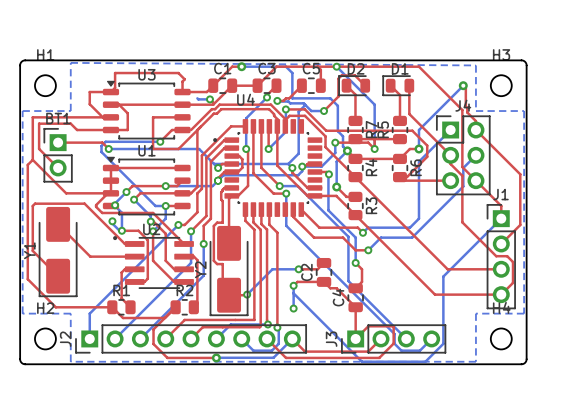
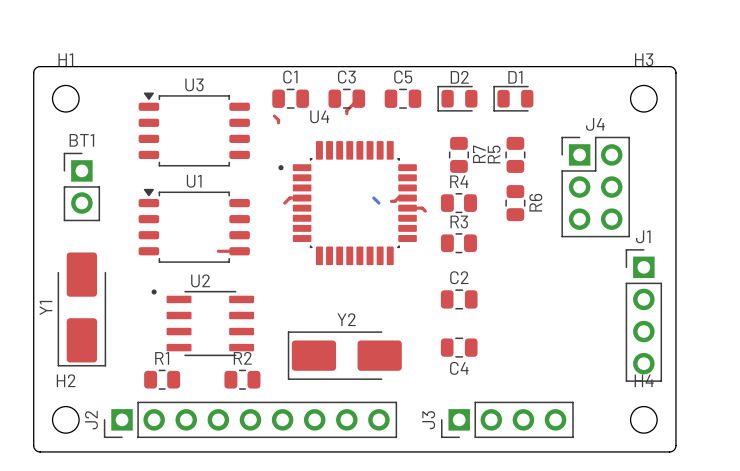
bottom zone outline: (70, 62) (70, 111) (22, 111) (22, 313) (70, 313) (70, 361) (475, 361) (475, 313) (524, 313) (524, 111) (475, 111) (475, 65) (70, 62) -> none
top track: (241, 66) (232, 66) (206, 92) (182, 92) (182, 81) (184, 79) (178, 73) (115, 73) (115, 87) (110, 92) (89, 92) (89, 104) (102, 117) -> none
bottom track: (241, 66) (286, 66) (292, 73) (292, 98) (330, 98) (337, 105) (337, 131) (343, 136) (343, 146) (347, 150) (336, 161) (336, 187) -> none
via: (241, 66) -> none
top track: (317, 66) (320, 69) (320, 85) -> none
bottom track: (336, 66) (374, 104) (374, 149) -> none
via: (336, 66) -> none
top track: (301, 85) (289, 98) (277, 100) -> none
top track: (346, 85) (355, 94) (355, 120) -> none
top track: (365, 85) (354, 75) (341, 75) (338, 78) (338, 96) (324, 111) -> none
top track: (390, 85) (399, 95) (399, 120) -> none
top track: (409, 85) (409, 114) (450, 155) (450, 164) (462, 175) (462, 222) (496, 256) (507, 256) (513, 262) (513, 282) (501, 294) (435, 294) (336, 195) (307, 195) (277, 165) (277, 119) (269, 109) (221, 109) (216, 113) (213, 113) (178, 149) (153, 149) (153, 117) (182, 117) -> none
top track: (463, 85) (465, 88) (467, 112) (475, 121) (475, 130) (520, 174) (520, 224) (501, 243) -> none
bottom track: (463, 85) (418, 130) (418, 149) -> none
via: (463, 85) -> none
bottom track: (267, 97) (246, 118) (246, 149) -> none
via: (267, 97) -> none
bottom track: (197, 98) (209, 99) -> none
via: (209, 99) -> none
bottom track: (277, 100) (303, 103) (311, 111) (324, 111) -> none
via: (277, 100) -> none
top track: (110, 104) (213, 104) (232, 85) (257, 85) (276, 66) (418, 66) (462, 110) (462, 167) (501, 205) (501, 218) -> none
top track: (119, 104) (127, 113) (127, 130) (77, 130) (70, 123) (39, 123) (39, 148) (58, 167) -> none
bottom track: (305, 104) (298, 111) (298, 153) (288, 163) (214, 163) -> none
top track: (285, 109) (304, 109) (326, 130) (412, 130) (427, 145) (427, 156) (406, 177) (399, 177) (403, 180) (450, 180) -> none
bottom track: (285, 109) (285, 131) (268, 149) -> none
via: (285, 109) -> none
via: (324, 111) -> none
top track: (110, 117) (32, 117) (32, 159) -> none
top track: (285, 120) (289, 115) (304, 115) (325, 136) (325, 147) (447, 269) (501, 269) -> none
top track: (245, 126) (231, 126) (201, 155) (201, 188) (197, 193) (197, 212) (184, 224) (178, 224) -> none
top track: (253, 126) (253, 173) (273, 193) (286, 193) -> none
top track: (261, 126) (261, 167) (279, 186) -> none
top track: (269, 126) (268, 149) -> none
top track: (285, 126) (285, 119) (270, 104) (219, 104) (215, 109) (211, 109) (191, 130) -> none
top track: (182, 130) (172, 130) (160, 141) -> none
top track: (197, 130) (197, 187) (191, 193) (140, 193) (134, 199) -> none
bottom track: (450, 130) (418, 161) (418, 218) (409, 227) (368, 227) (362, 232) -> none
top track: (355, 139) (399, 139) -> none
top track: (374, 139) (374, 149) (368, 142) (335, 142) -> none
top track: (231, 140) (224, 140) (206, 158) (206, 215) (191, 231) -> none
bottom track: (160, 141) (105, 141) (101, 146) (101, 152) (155, 205) (165, 205) (165, 218) (153, 231) -> none
via: (160, 141) -> none
top track: (58, 142) (102, 142) (108, 149) -> none
bottom track: (335, 142) (335, 152) (321, 166) (302, 166) (302, 171) (298, 175) (223, 175) (212, 186) (165, 186) -> none
via: (335, 142) -> none
top track: (231, 148) (224, 148) (210, 161) (210, 218) (203, 225) (203, 243) -> none
bottom track: (108, 149) (199, 149) (218, 168) -> none
via: (108, 149) -> none
top track: (246, 149) (248, 150) (248, 185) (238, 195) (231, 195) (229, 198) (229, 243) -> none
via: (246, 149) -> none
via: (268, 149) -> none
via: (374, 149) -> none
top track: (418, 149) (409, 149) (399, 158) (355, 158) (347, 150) -> none
via: (418, 149) -> none
via: (347, 150) -> none
bottom track: (475, 155) (463, 168) (463, 186) (412, 237) (381, 237) (368, 250) -> none
top track: (231, 156) (239, 156) (242, 159) (242, 167) (238, 171) (224, 171) (218, 180) -> none
top track: (32, 159) (27, 164) (27, 279) (55, 307) (112, 307) (123, 318) (164, 318) -> none
top track: (32, 159) (66, 193) (110, 193) (110, 168) (182, 168) -> none
via: (302, 166) -> none
R4 name position: R4 (371, 167) -> R4 (459, 181)
via: (218, 168) -> none
top track: (292, 168) (292, 172) (307, 187) (321, 187) -> none
via: (292, 168) -> none
R4 rotation: 0° (355, 168) -> 90° clockwise (458, 203)
bottom track: (328, 174) (328, 210) (355, 237) (355, 262) -> none
via: (328, 174) -> none
top track: (180, 180) (182, 180) (177, 186) (132, 186) (126, 192) -> none
via: (218, 180) -> none
via: (165, 186) -> none
bottom track: (279, 186) (297, 186) (348, 236) (348, 281) (406, 338) -> none
via: (279, 186) -> none
top track: (231, 187) (224, 187) (221, 192) (222, 222) (217, 222) (213, 225) (213, 260) (217, 264) (222, 264) (222, 288) (229, 295) (247, 294) -> none
top track: (336, 187) (346, 196) (355, 196) -> none
via: (336, 187) -> none
bottom track: (126, 192) (115, 203) (121, 212) (121, 230) (119, 230) (111, 222) (112, 221) -> none
via: (126, 192) -> none
top track: (107, 193) (96, 205) (102, 212) (153, 212) (184, 243) -> none
bottom track: (286, 193) (286, 225) (394, 334) (394, 343) (401, 350) (419, 350) (431, 338) (431, 332) -> none
via: (286, 193) -> none
bottom track: (134, 199) (150, 216) (150, 221) -> none
via: (134, 199) -> none
via: (115, 205) -> none
via: (165, 205) -> none
R3 rotation: 0° (355, 205) -> 90° clockwise (458, 243)
R3 name position: R3 (371, 205) -> R3 (459, 221)
top track: (245, 209) (245, 220) (254, 229) (254, 319) (184, 319) (165, 338) -> none
top track: (253, 209) (253, 222) (260, 229) (260, 326) (202, 327) (191, 338) -> none
top track: (261, 209) (261, 224) (267, 229) (267, 324) -> none
top track: (269, 209) (269, 224) (277, 232) (277, 327) -> none
top track: (293, 209) (293, 216) (314, 237) (343, 237) (355, 250) (368, 250) -> none
top track: (301, 209) (319, 227) (357, 227) (362, 232) -> none
bottom track: (501, 218) (443, 276) (443, 343) (425, 361) (362, 361) (293, 293) -> none
via: (112, 221) -> none
top track: (150, 221) (153, 221) (165, 233) (165, 260) (174, 269) (184, 269) -> none
via: (150, 221) -> none
top track: (58, 224) (90, 256) (134, 256) -> none
bottom track: (178, 224) (89, 313) (89, 338) -> none
via: (178, 224) -> none
top track: (121, 230) (138, 230) (147, 240) (147, 278) (144, 281) (134, 281) -> none
via: (121, 230) -> none
top track: (153, 231) (153, 260) (174, 281) (184, 281) -> none
via: (153, 231) -> none
bottom track: (191, 231) (191, 262) (115, 338) -> none
via: (191, 231) -> none
via: (362, 232) -> none
top track: (134, 243) (124, 243) (84, 203) (35, 203) (32, 205) (32, 250) (58, 276) -> none
bottom track: (203, 243) (203, 275) (140, 338) -> none
via: (203, 243) -> none
via: (368, 250) -> none
top track: (184, 256) (193, 256) (197, 260) (197, 303) (193, 307) -> none
top track: (324, 262) (317, 269) (298, 269) -> none
top track: (355, 262) (362, 269) (362, 281) (357, 286) -> none
via: (355, 262) -> none
top track: (134, 269) (124, 269) (121, 272) (121, 298) (130, 307) -> none
bottom track: (298, 269) (272, 269) (247, 294) -> none
via: (298, 269) -> none
Y2 rotation: 0° (229, 270) -> 90° clockwise (344, 355)
C2 rotation: 0° (324, 272) -> 90° clockwise (459, 299)
C2 position: (324, 272) -> (459, 299)
top track: (293, 285) (297, 281) (324, 281) (330, 288) (336, 288) (355, 307) (355, 338) (368, 326) (393, 326) (393, 343) (379, 357) (286, 357) (267, 338) -> none
bottom track: (293, 285) (293, 308) -> none
via: (293, 285) -> none
via: (247, 294) -> none
C4 name position: C4 (338, 297) -> C4 (459, 368)
C4 rotation: 0° (355, 297) -> 90° clockwise (459, 347)
top track: (175, 307) (153, 329) (153, 344) (167, 357) (216, 357) -> none
via: (293, 308) -> none
bottom track: (267, 324) (230, 324) (216, 338) -> none
via: (267, 324) -> none
bottom track: (277, 327) (278, 343) (271, 350) (253, 350) (241, 338) -> none
via: (277, 327) -> none
top track: (292, 338) (305, 351) (368, 351) (381, 338) -> none
bottom track: (292, 338) (273, 357) (216, 357) -> none
via: (216, 357) -> none

